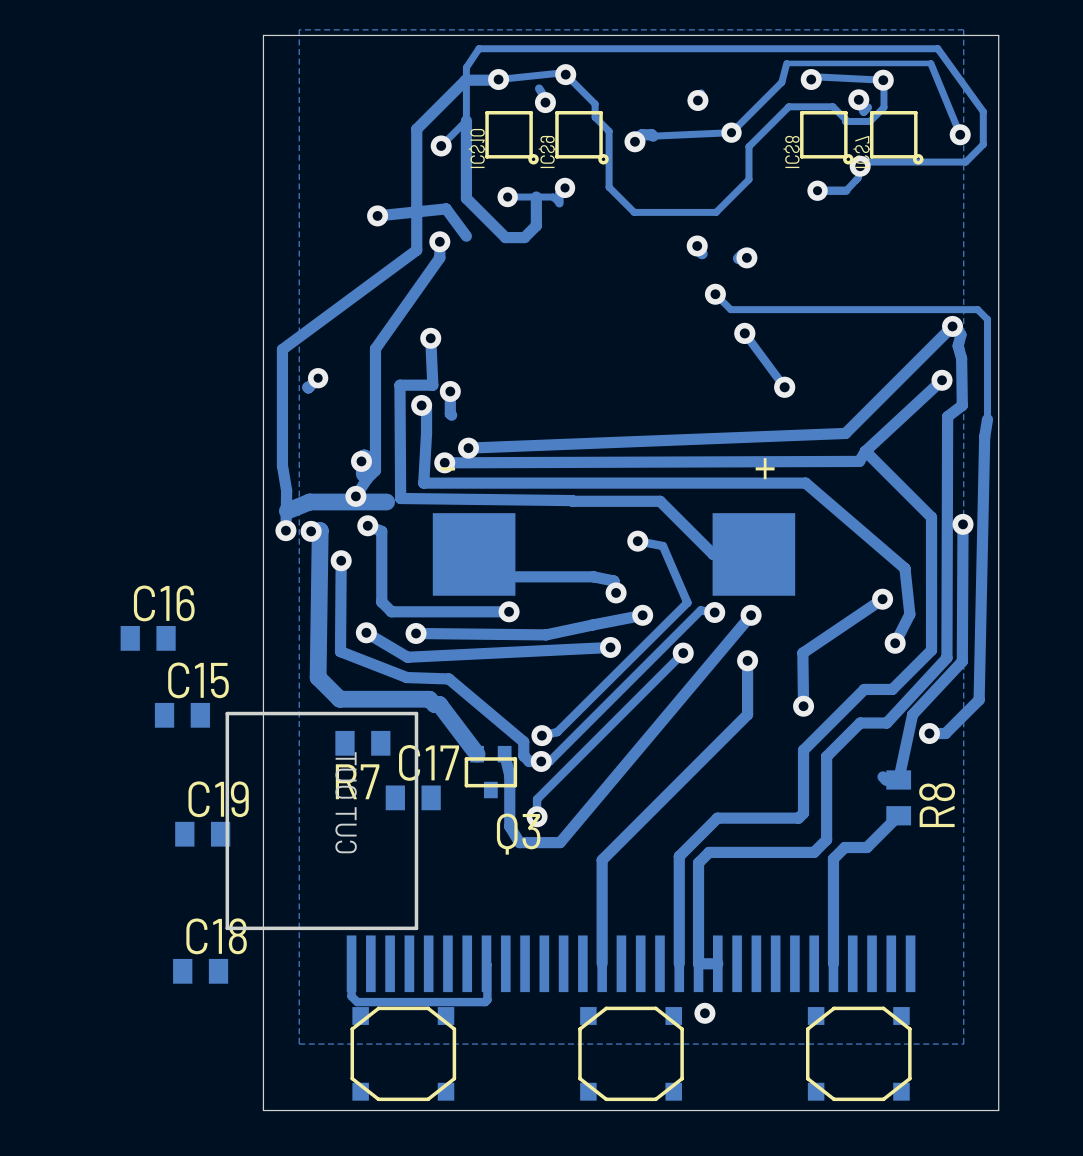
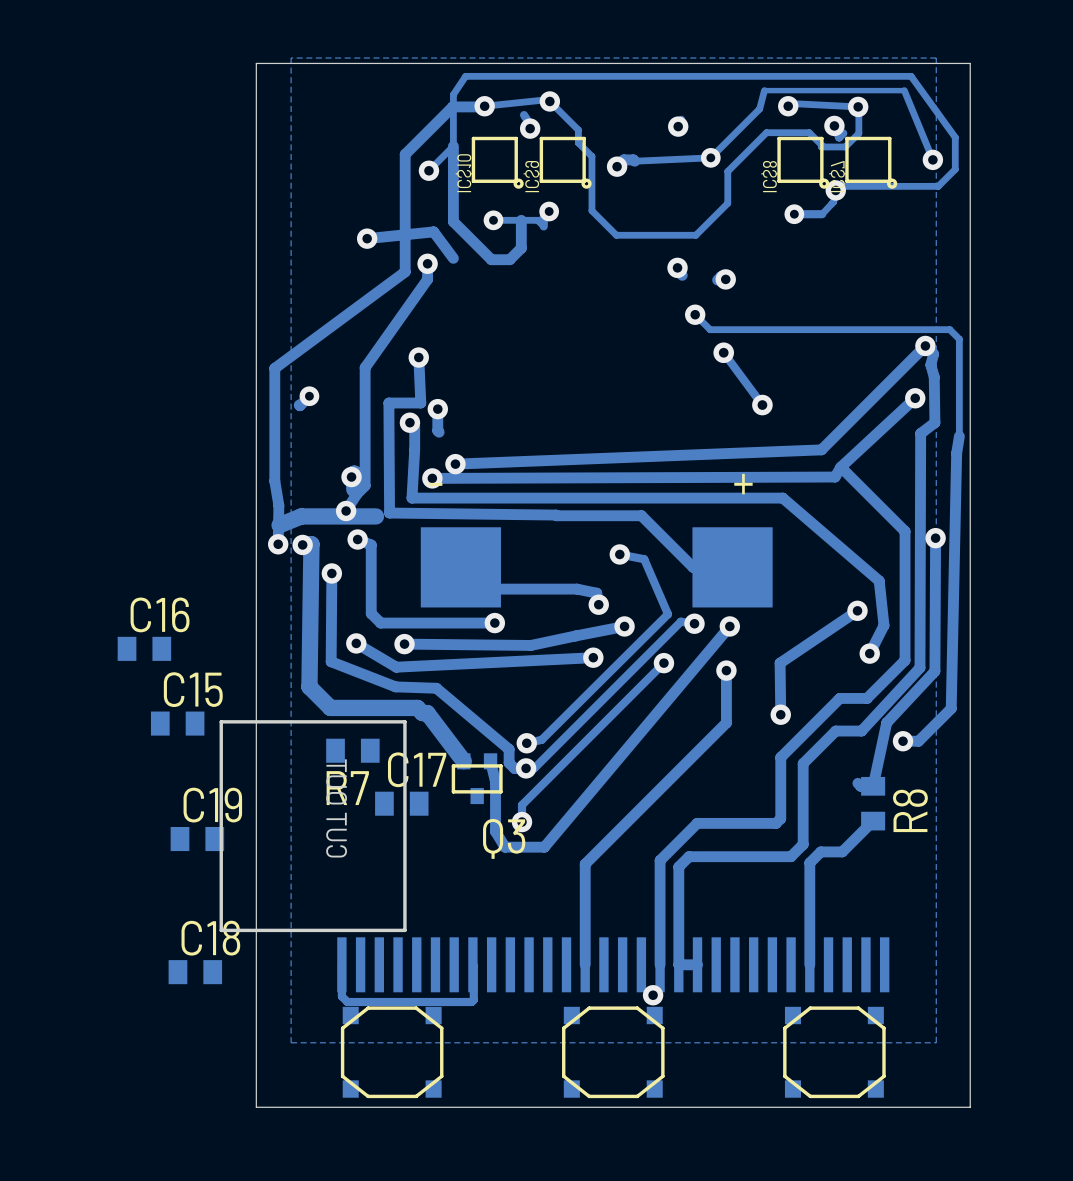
via position: (704, 1013) -> (653, 995)

